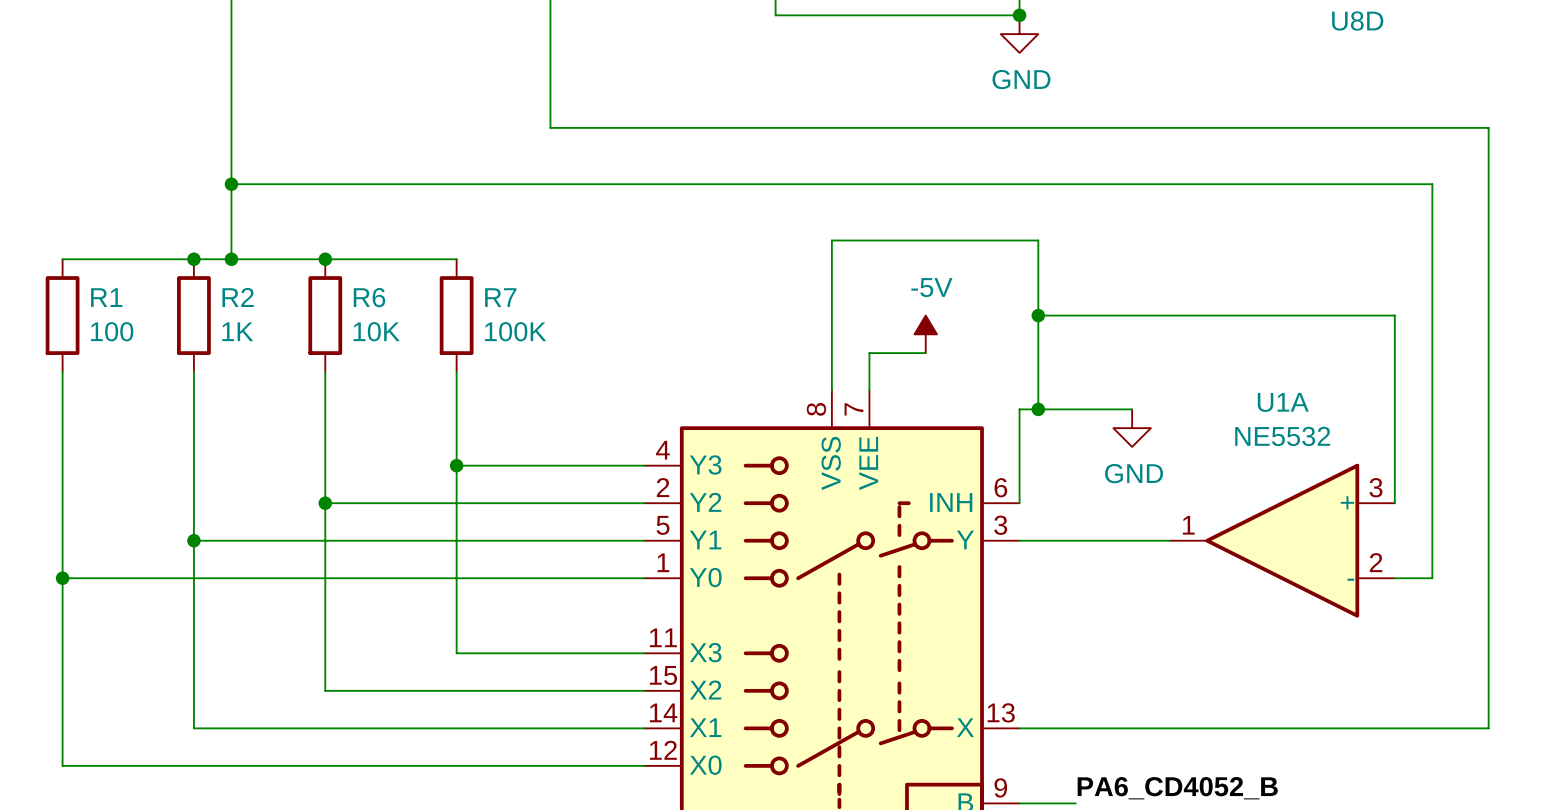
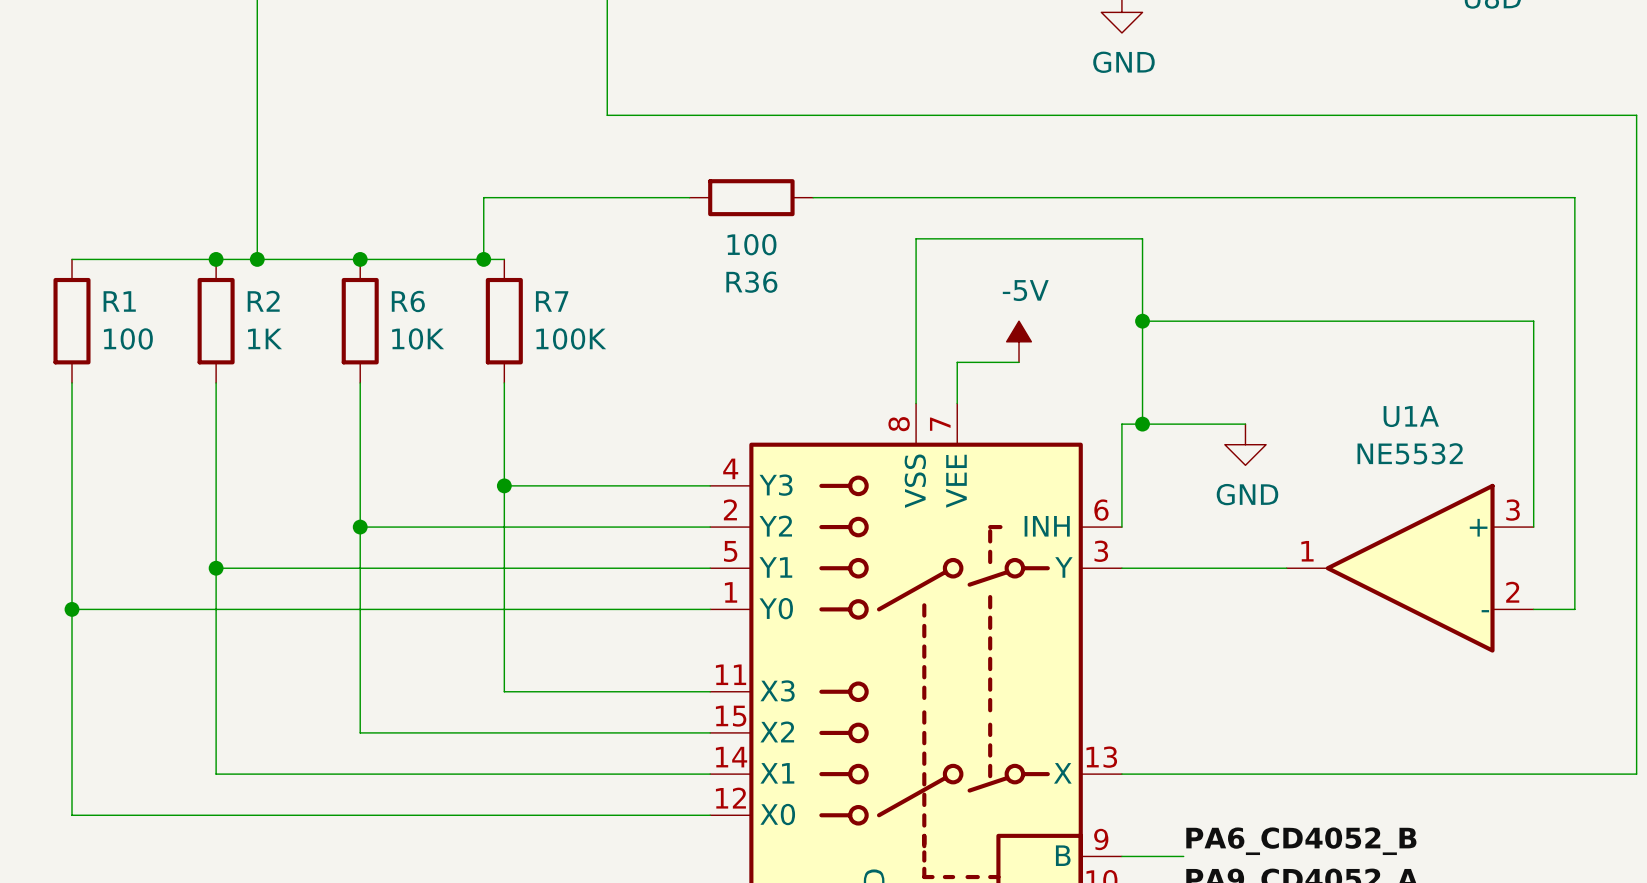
wire: (231, 184) (1432, 184) (1432, 202) -> (813, 197) (1574, 197)
junction: (231, 184) -> none
wire: none -> (689, 197) (483, 197) (483, 259)
R36: none -> 100 (751, 197)
junction: none -> (483, 259)

